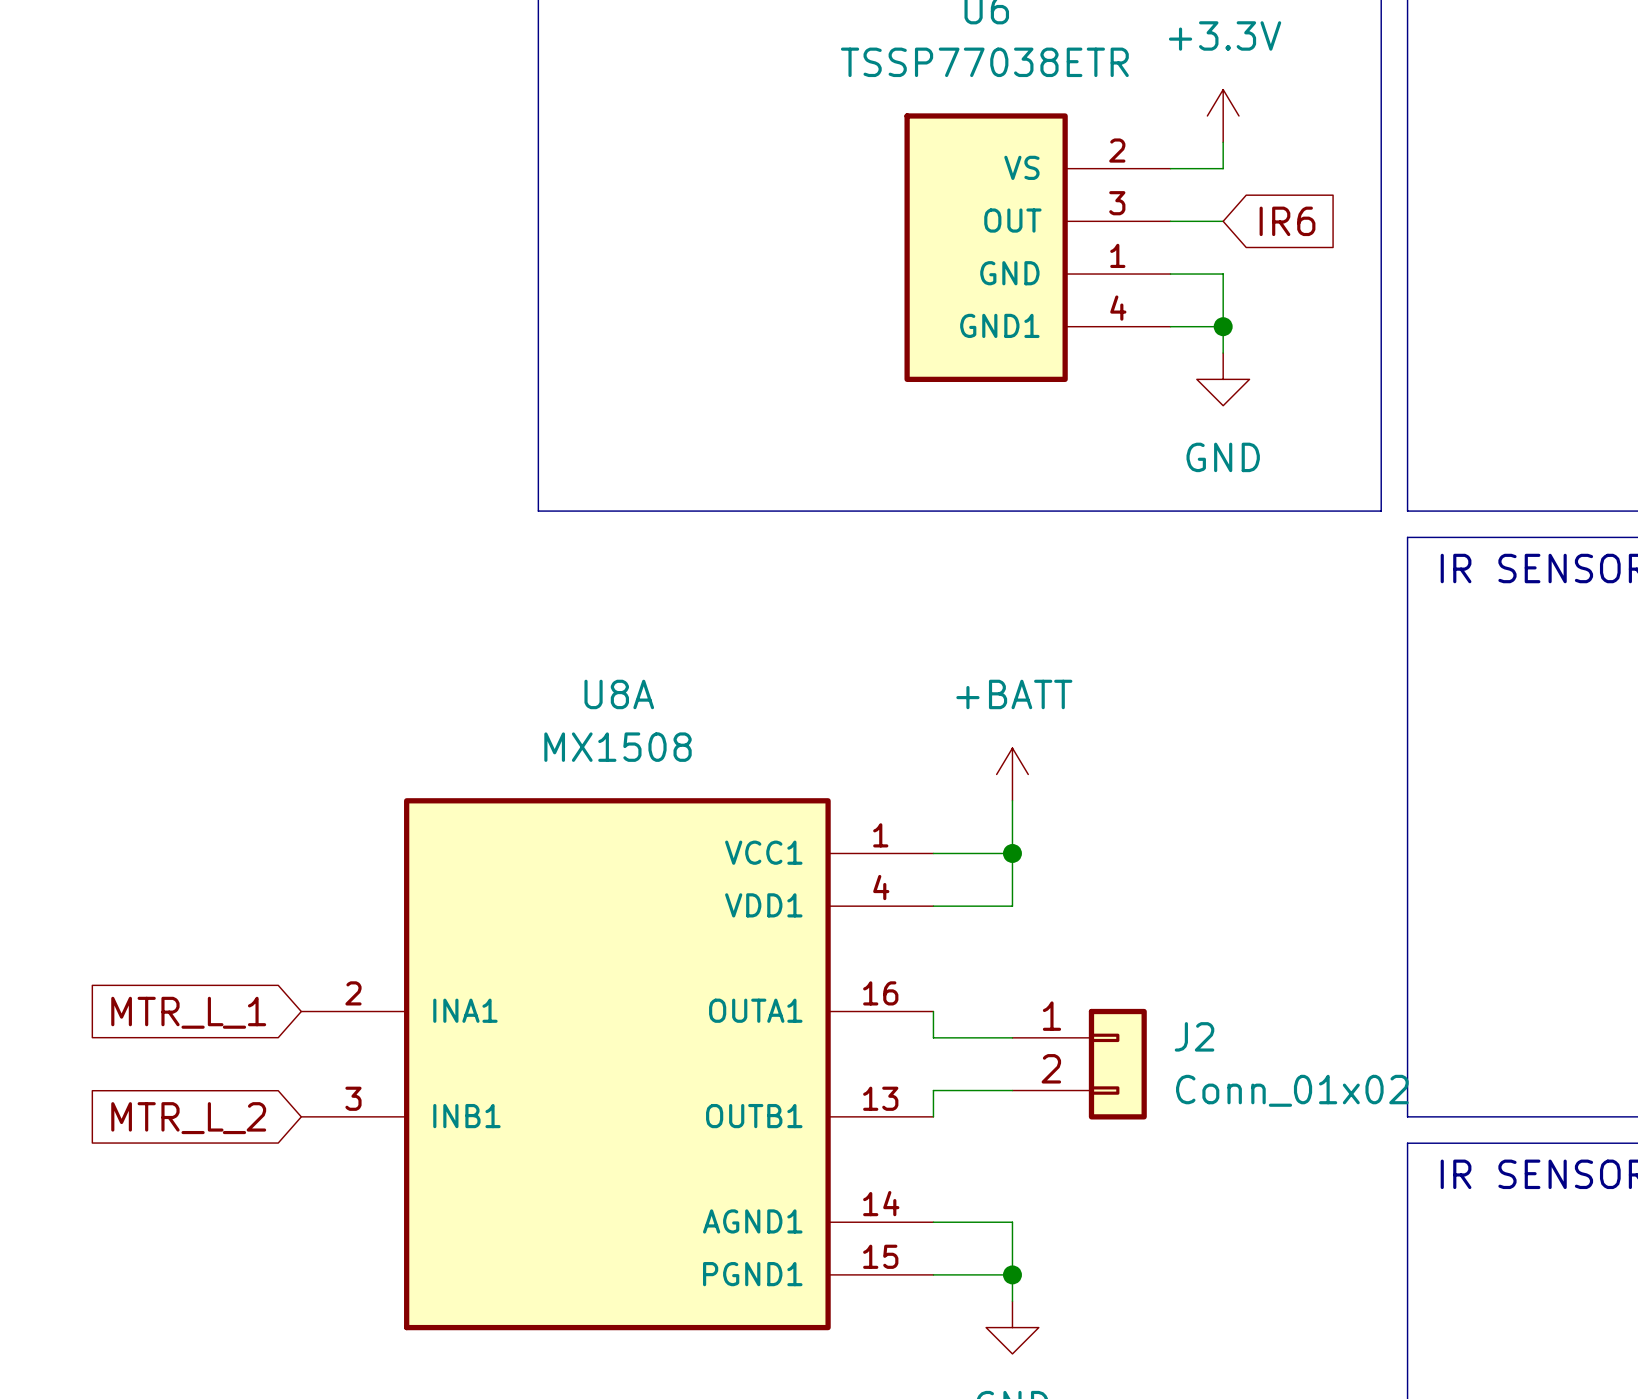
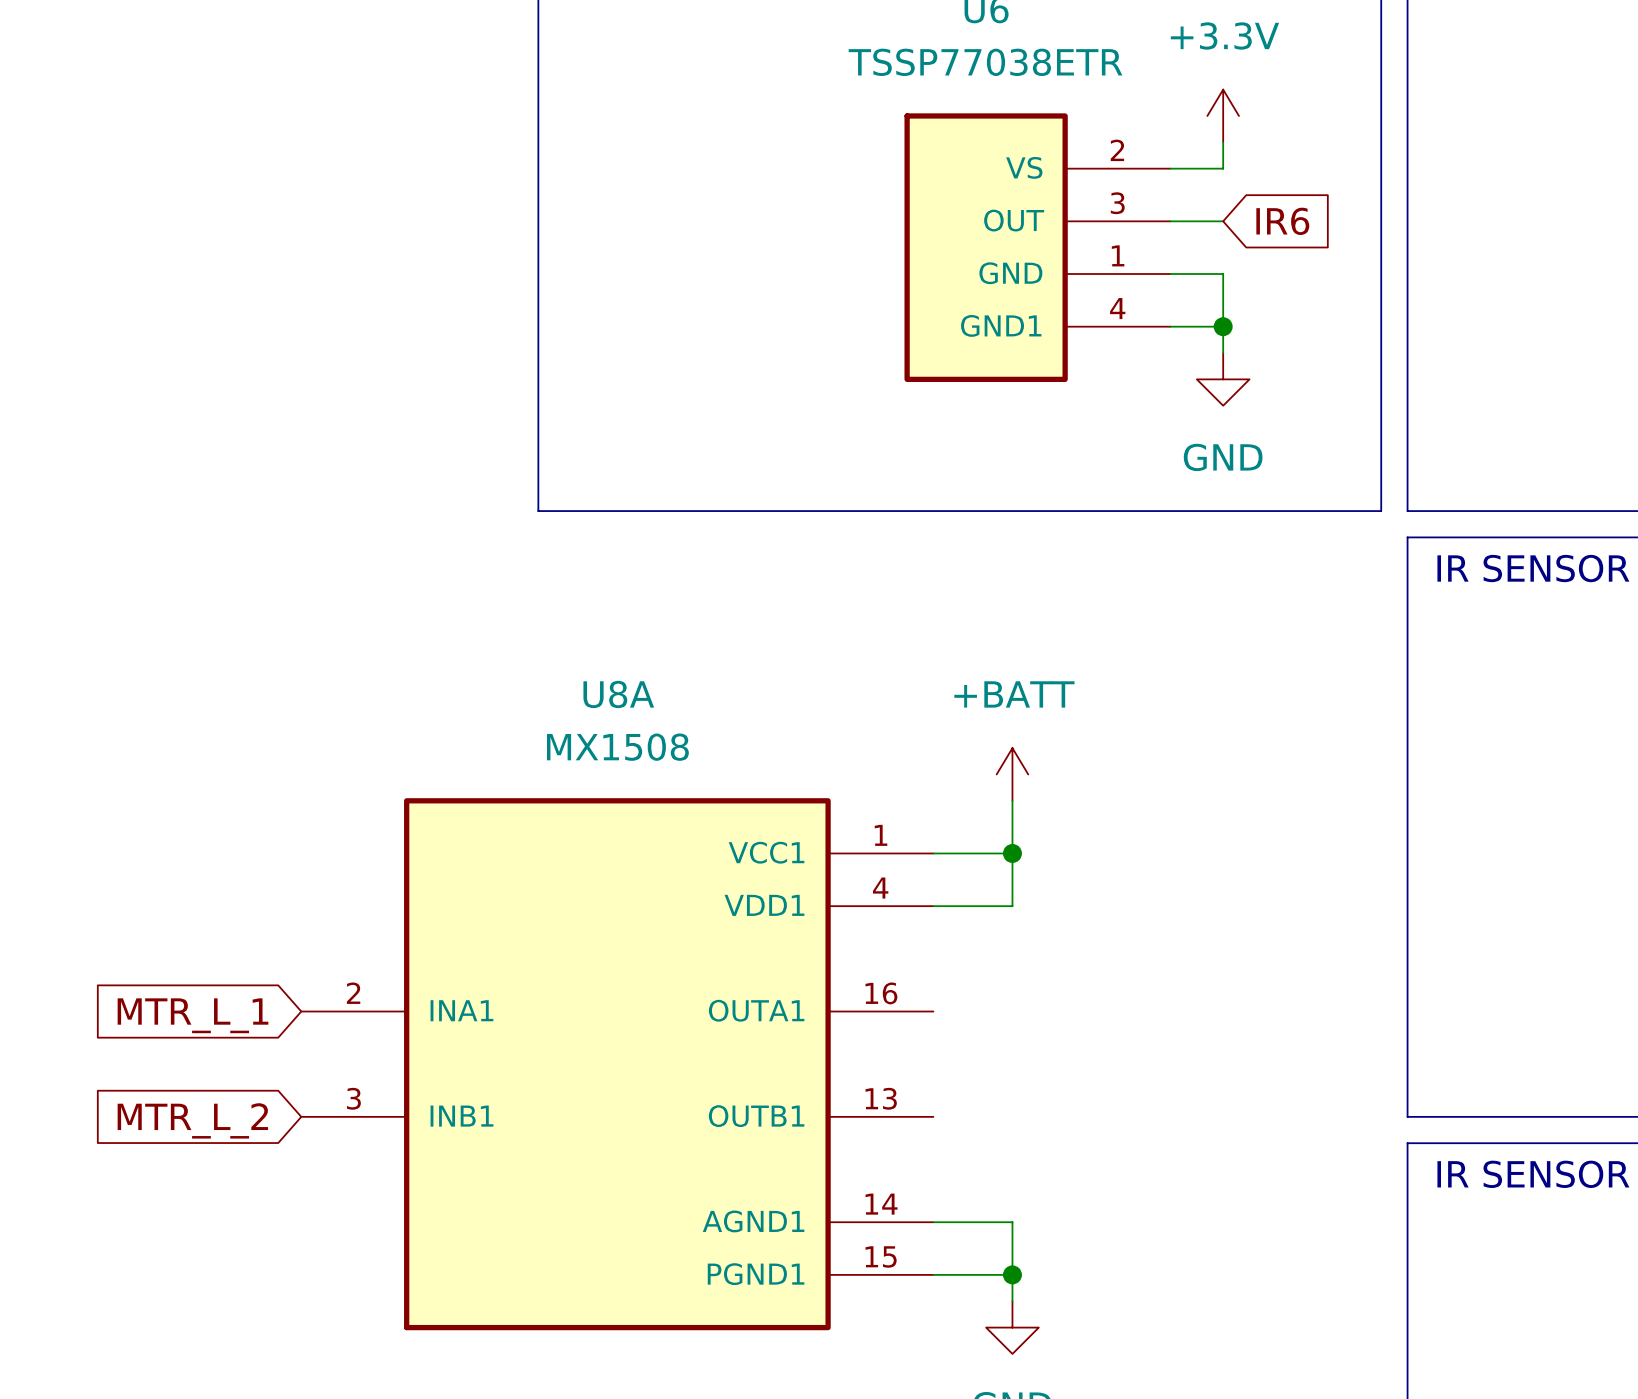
wire: (933, 1011) (933, 1037) (1012, 1037) -> none
J2: Conn_01x02 (1079, 1064) -> none
wire: (1012, 1090) (933, 1090) (933, 1116) -> none

